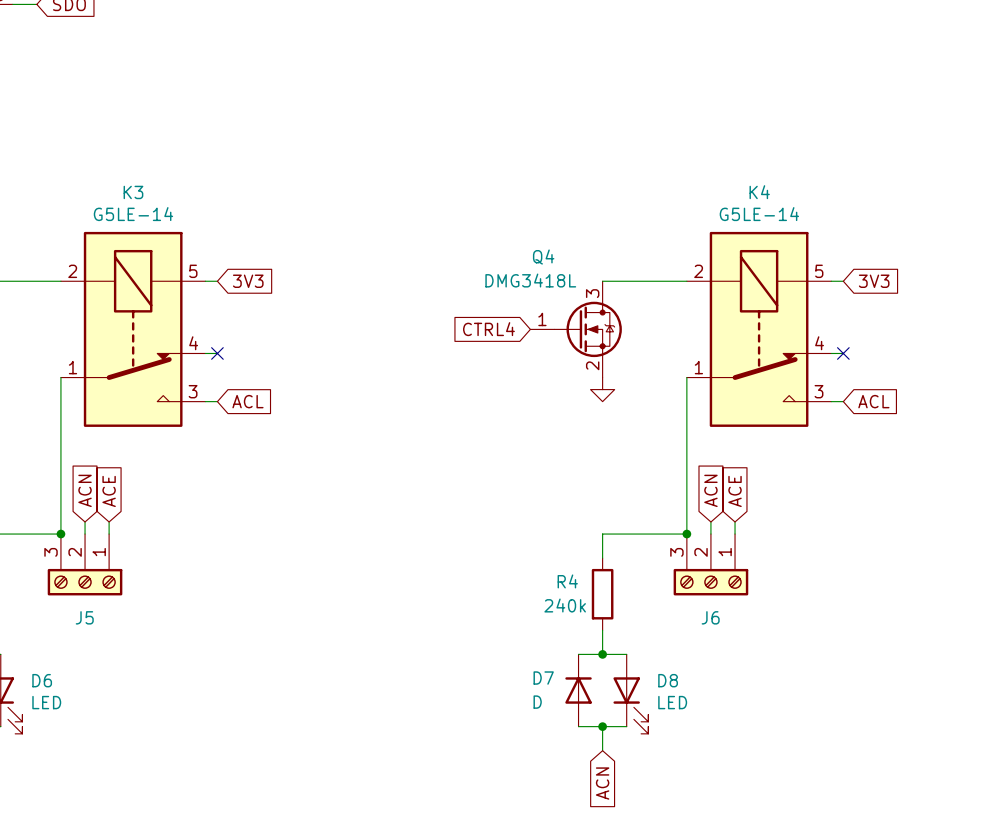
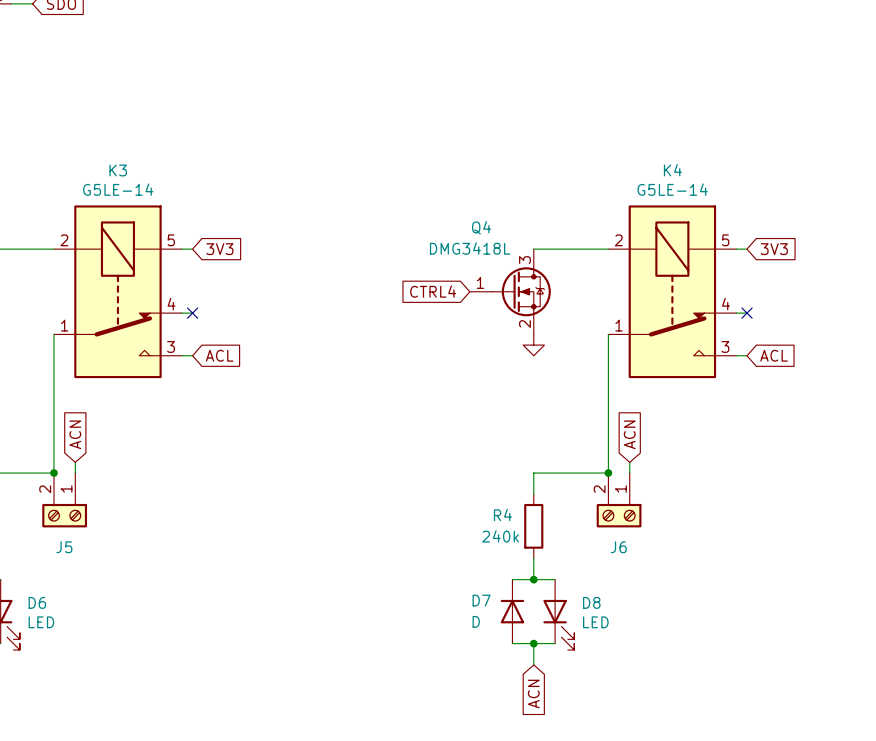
global label: ACE (109, 491) -> none
global label: ACE (735, 491) -> none
wire: (109, 521) (109, 534) -> none
wire: (735, 521) (735, 534) -> none
J5 symbol: [47, 534, 123, 596] -> [42, 473, 88, 528]
J6 symbol: [673, 534, 749, 596] -> [596, 473, 642, 528]

